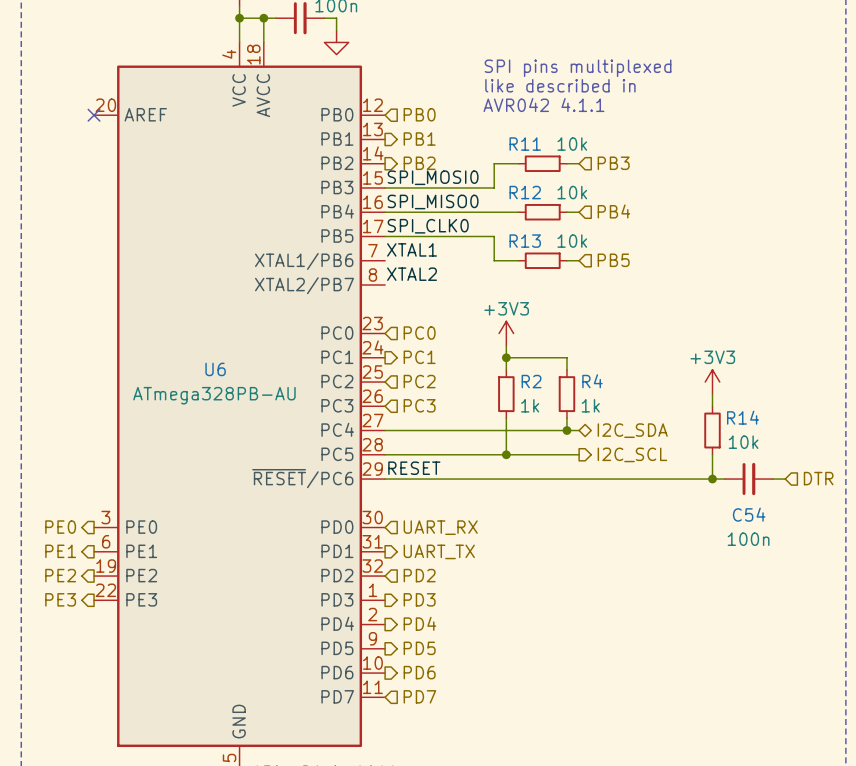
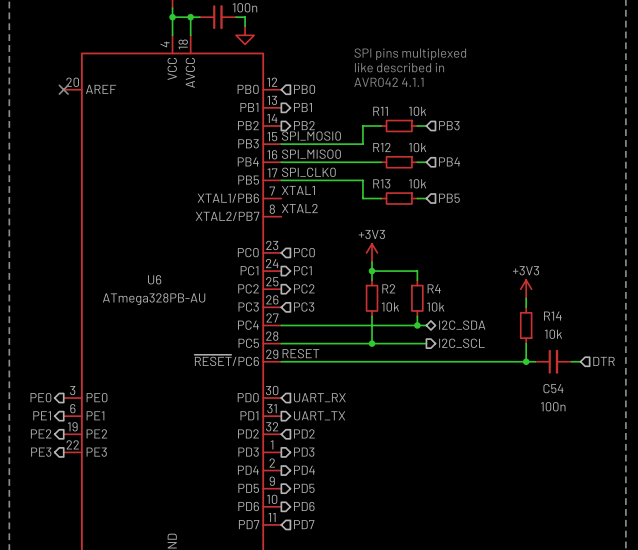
hierarchical label shape: input (419, 381) -> output (304, 288)
R2 value: 1k (530, 405) -> 10k (390, 307)
R4 value: 1k (590, 405) -> 10k (435, 307)

